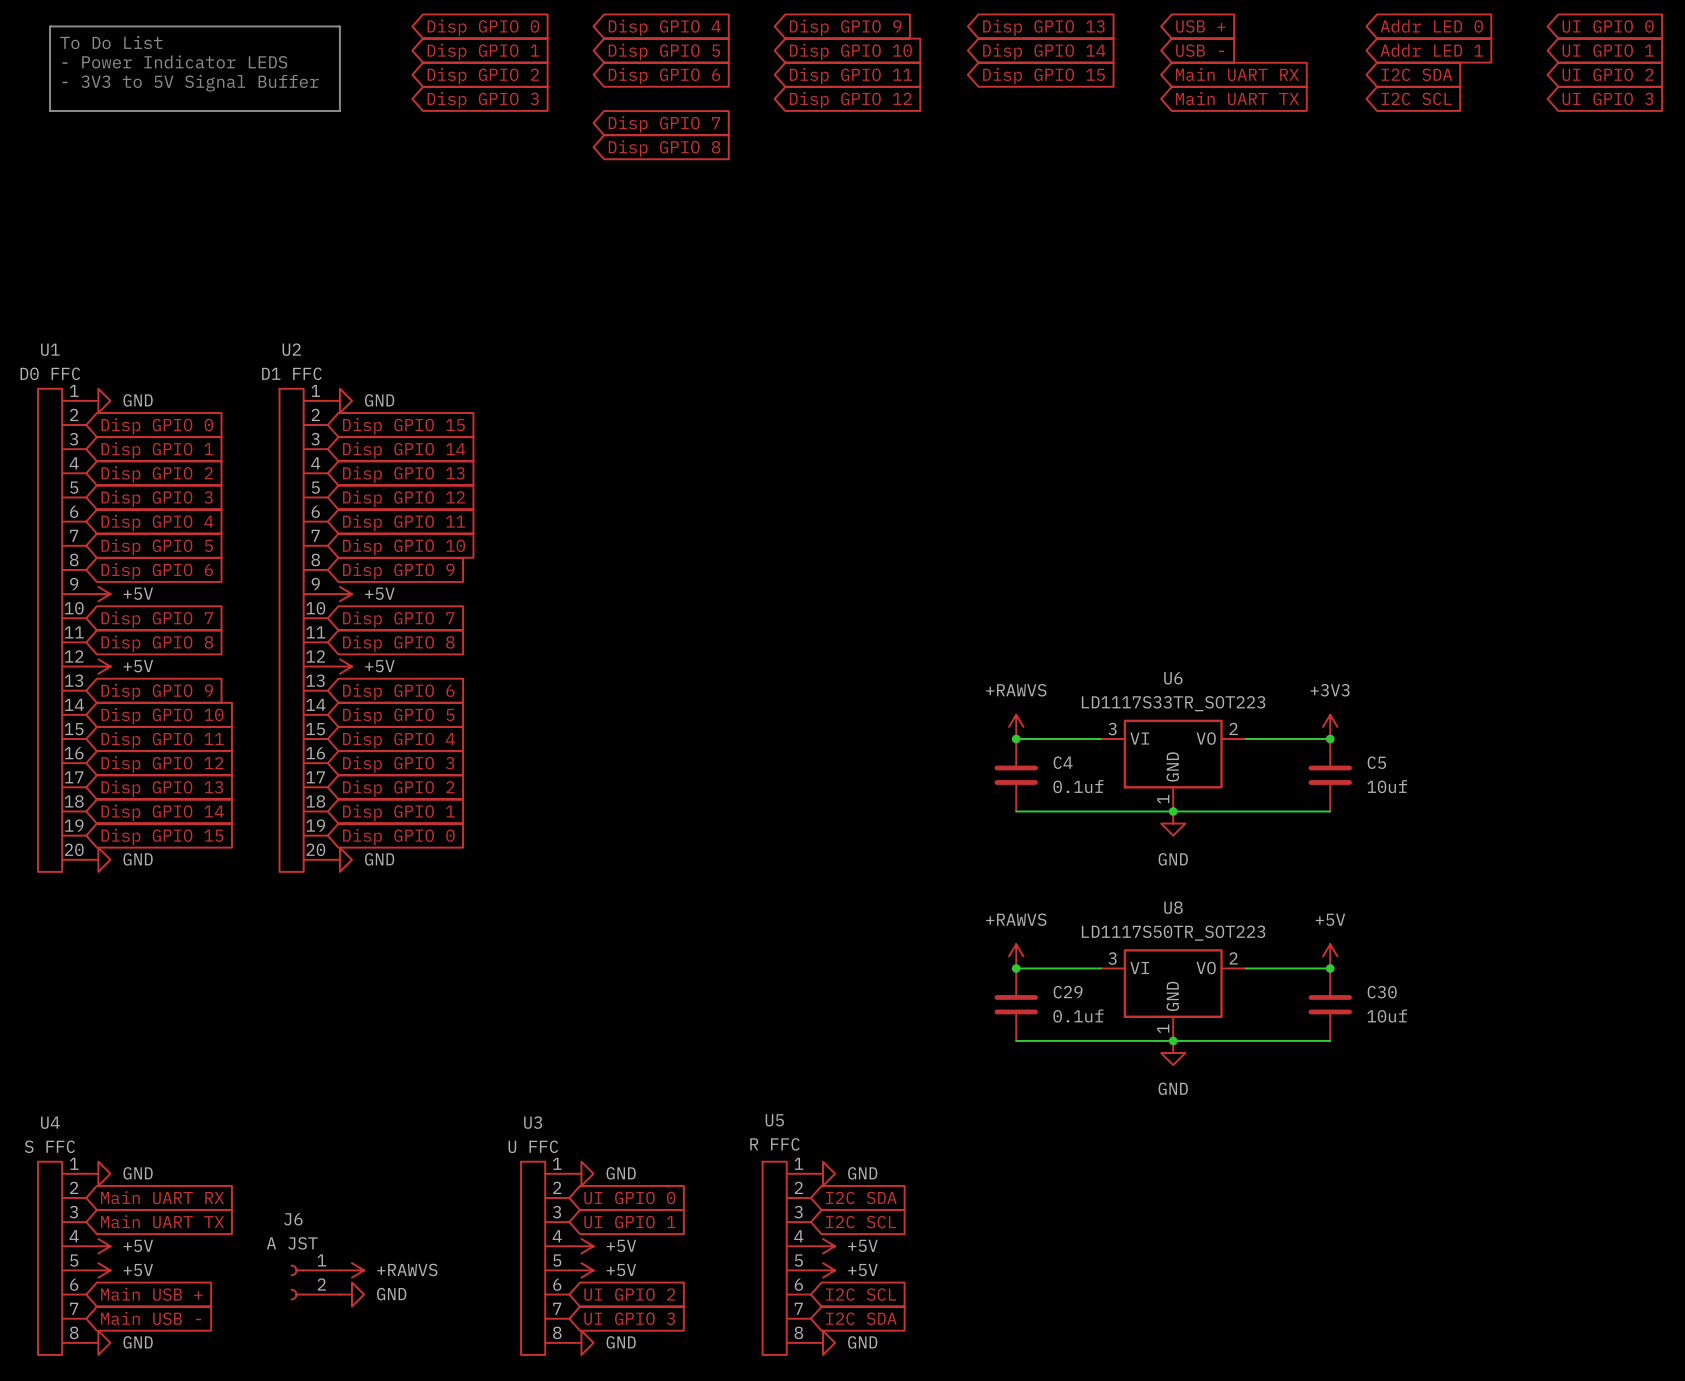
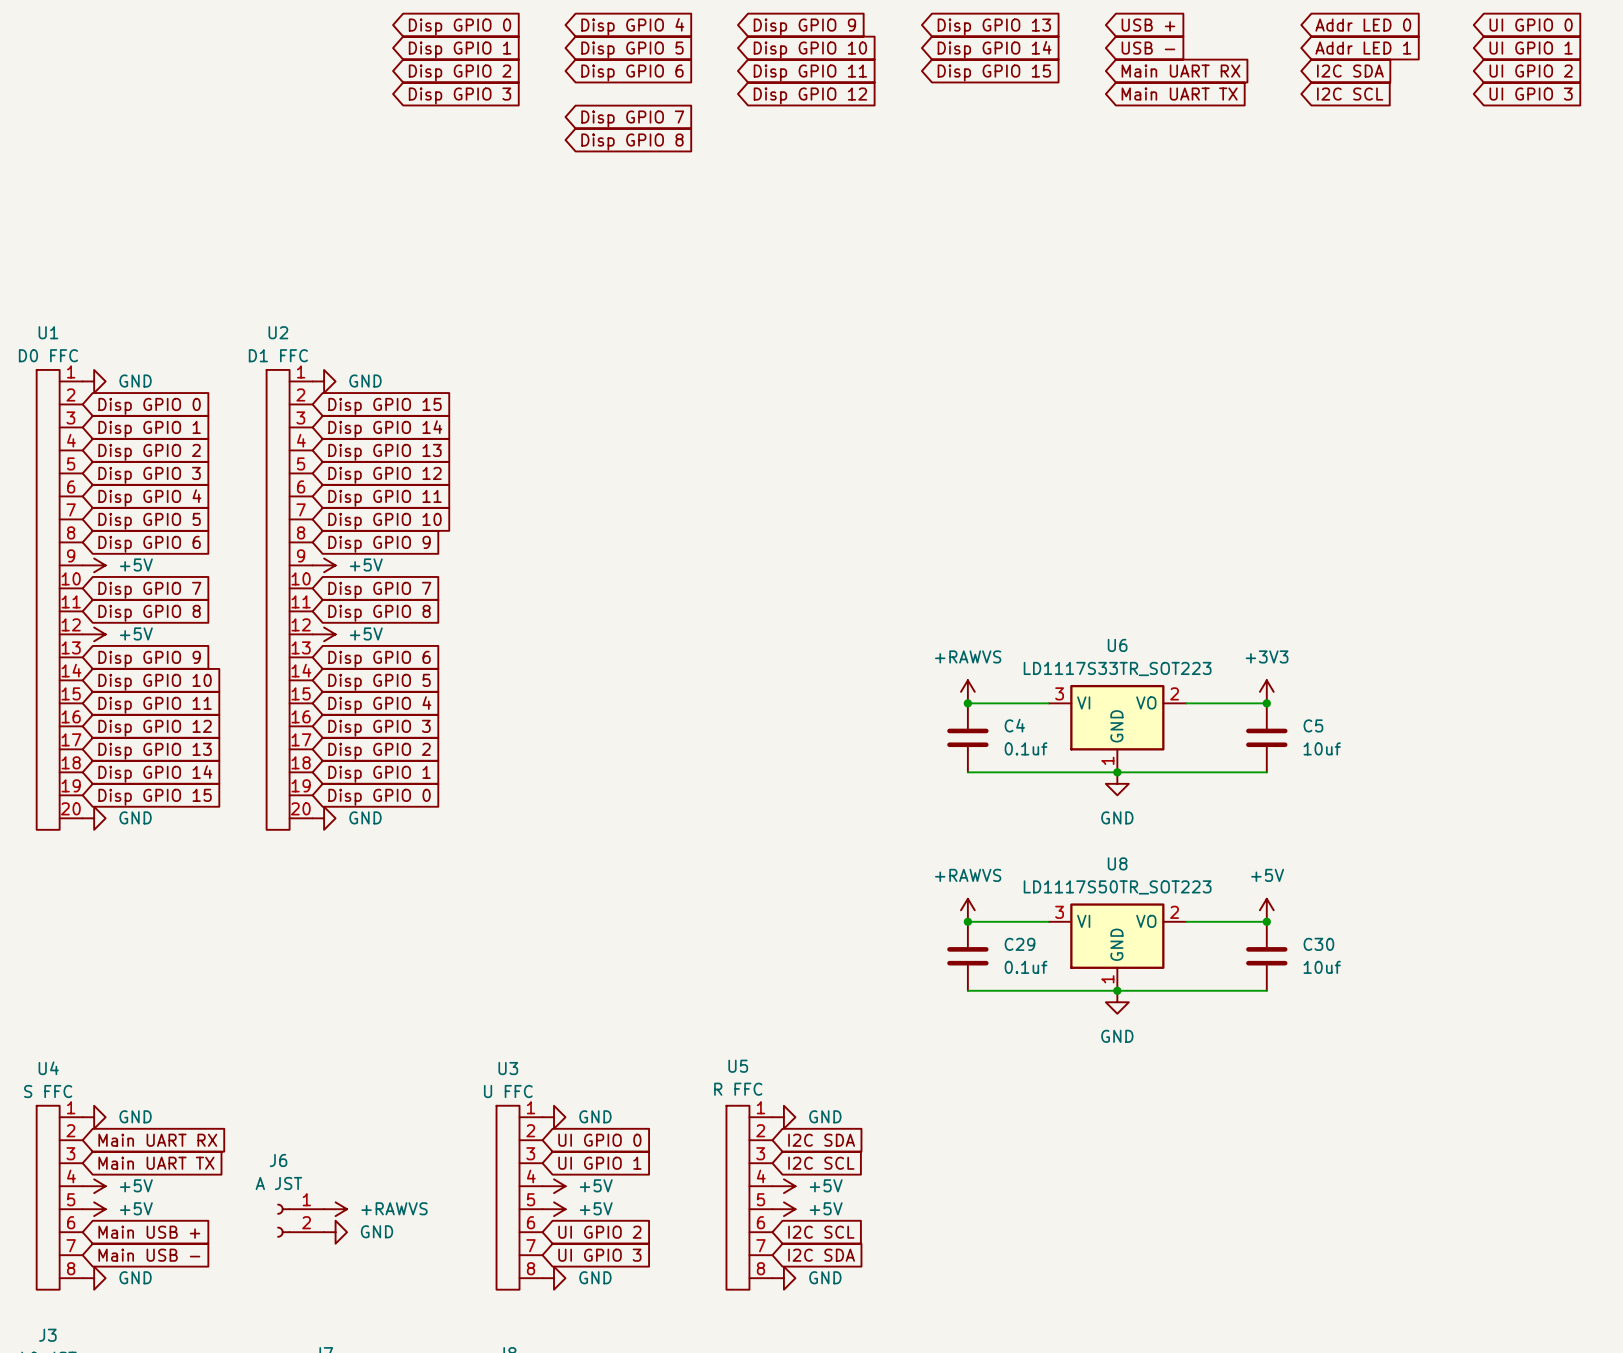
line: (50, 26) (339, 26) (339, 110) (50, 110) (50, 26) -> none
text: To Do List (111, 42) -> none
text: - Power Indicator LEDS (174, 61) -> none
text: - 3V3 to 5V Signal Buffer (190, 83) -> none

